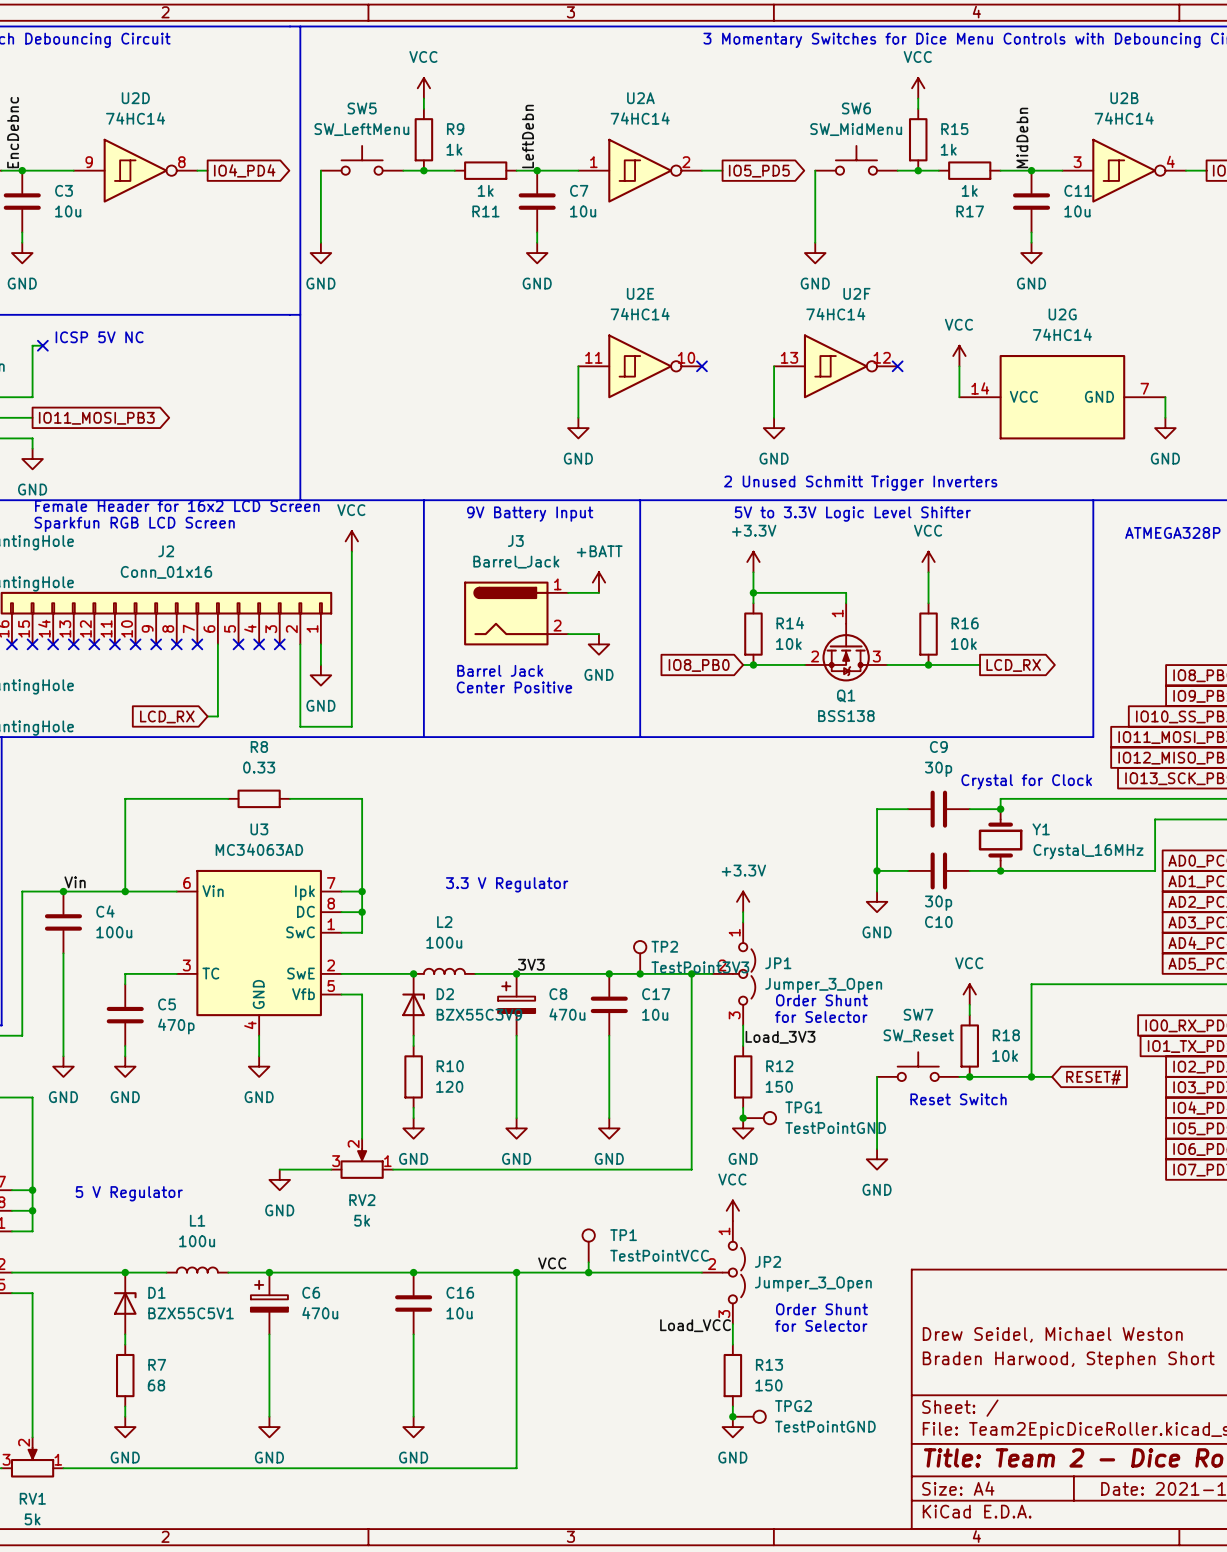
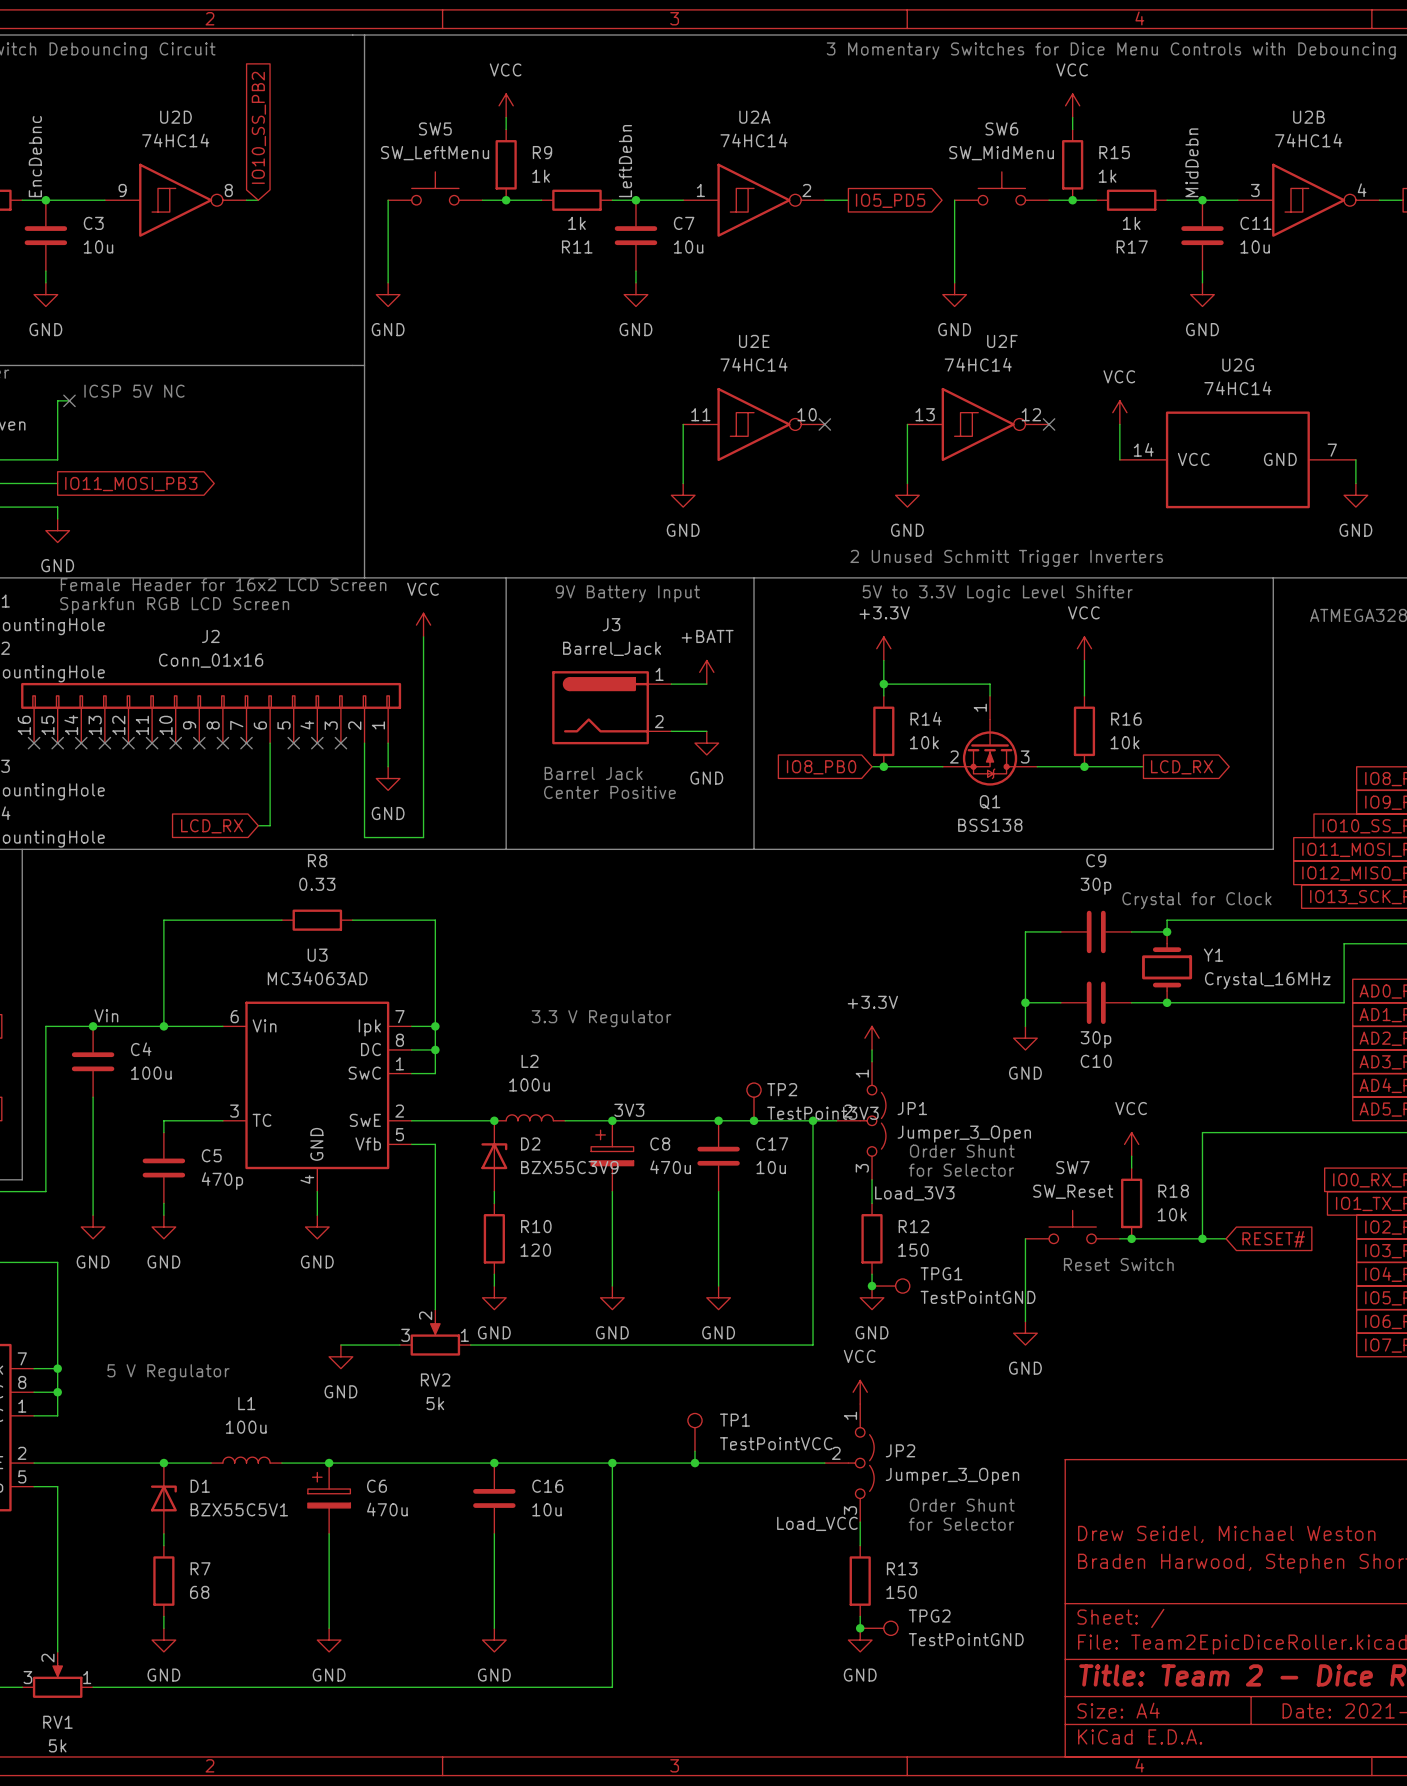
global label shape: output (244, 170) -> input (258, 127)
global label: IO4_PD4 (244, 170) -> IO10_SS_PB2 (258, 127)
label: VCC (552, 1263) -> none

